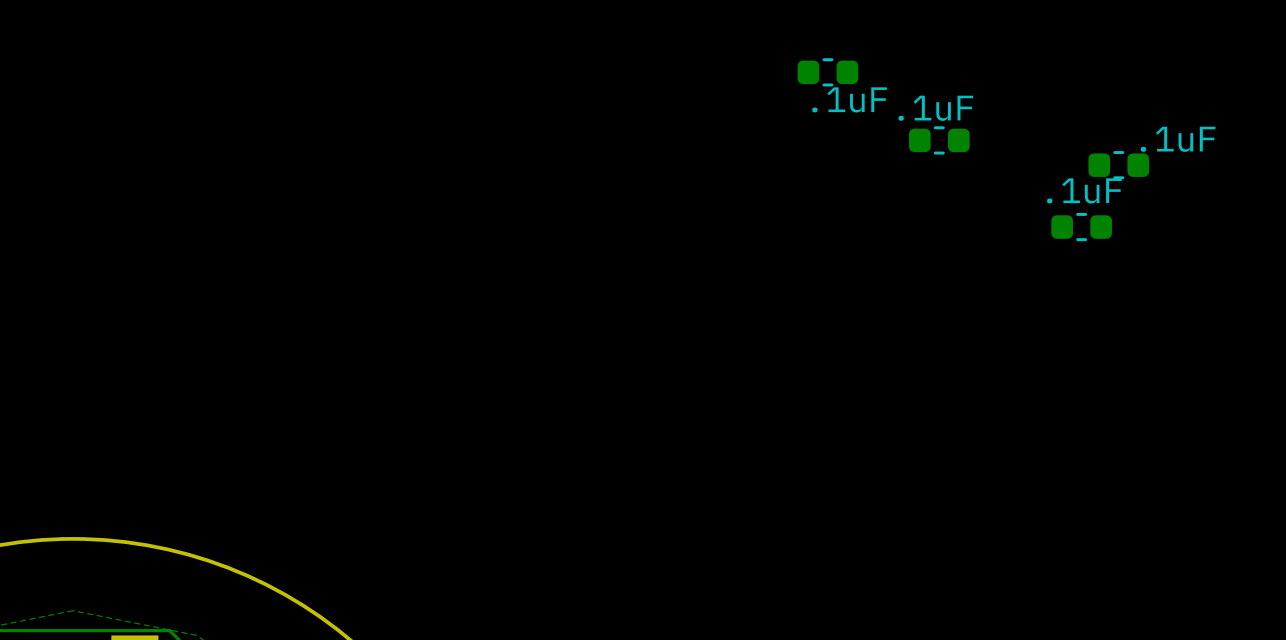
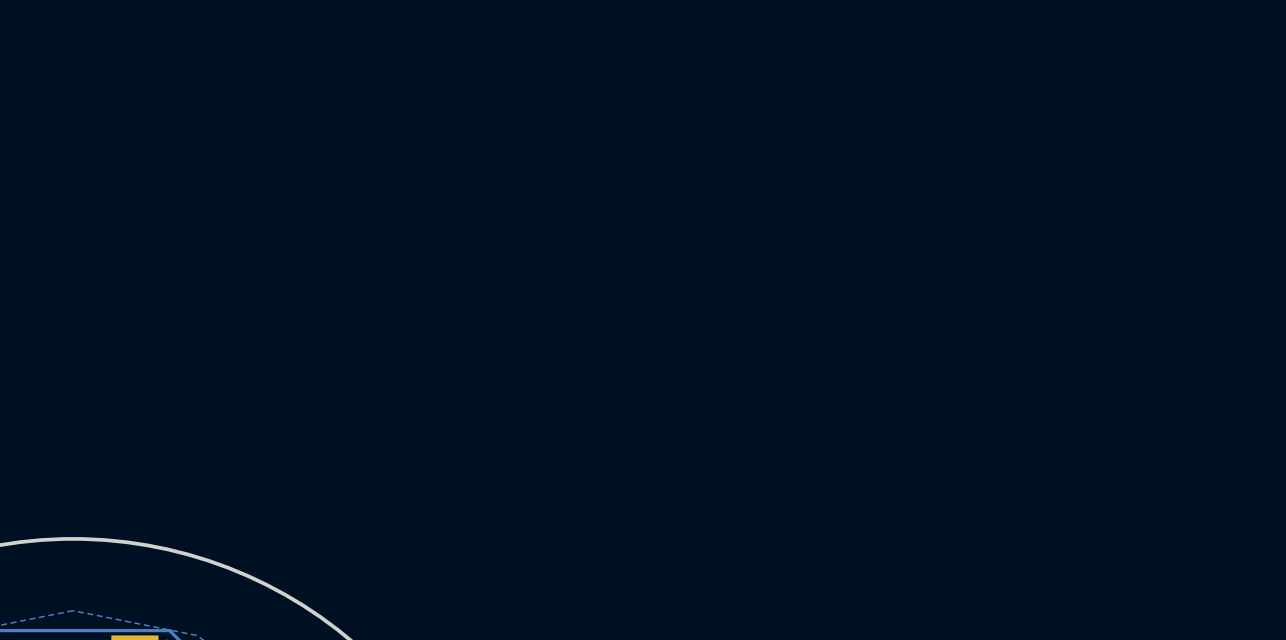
part: .1uF (827, 72) -> none
part: .1uF (939, 140) -> none
part: .1uF (1118, 165) -> none
part: .1uF (1081, 227) -> none

